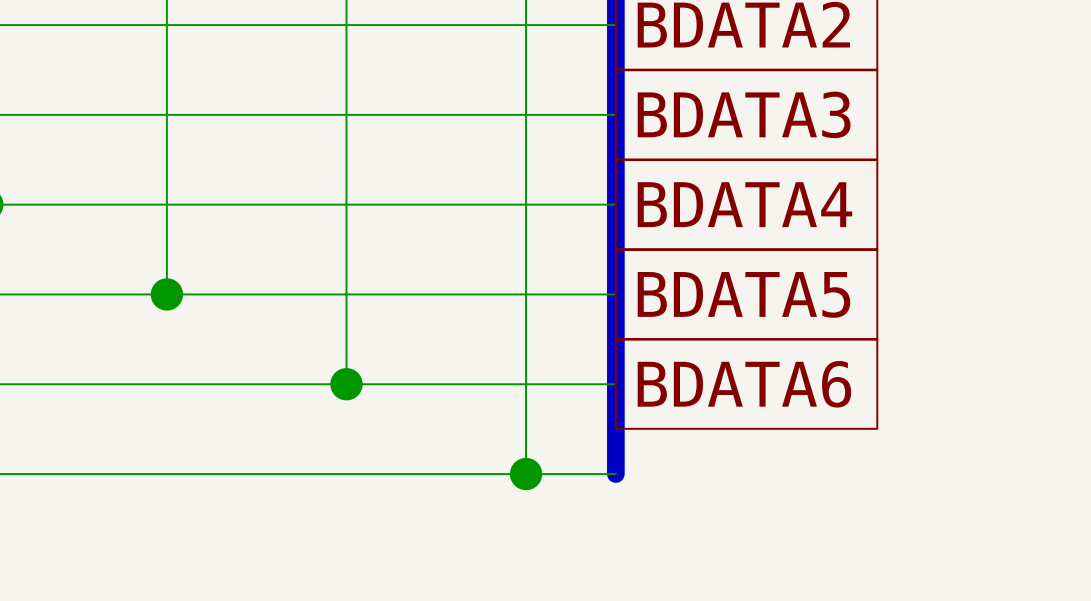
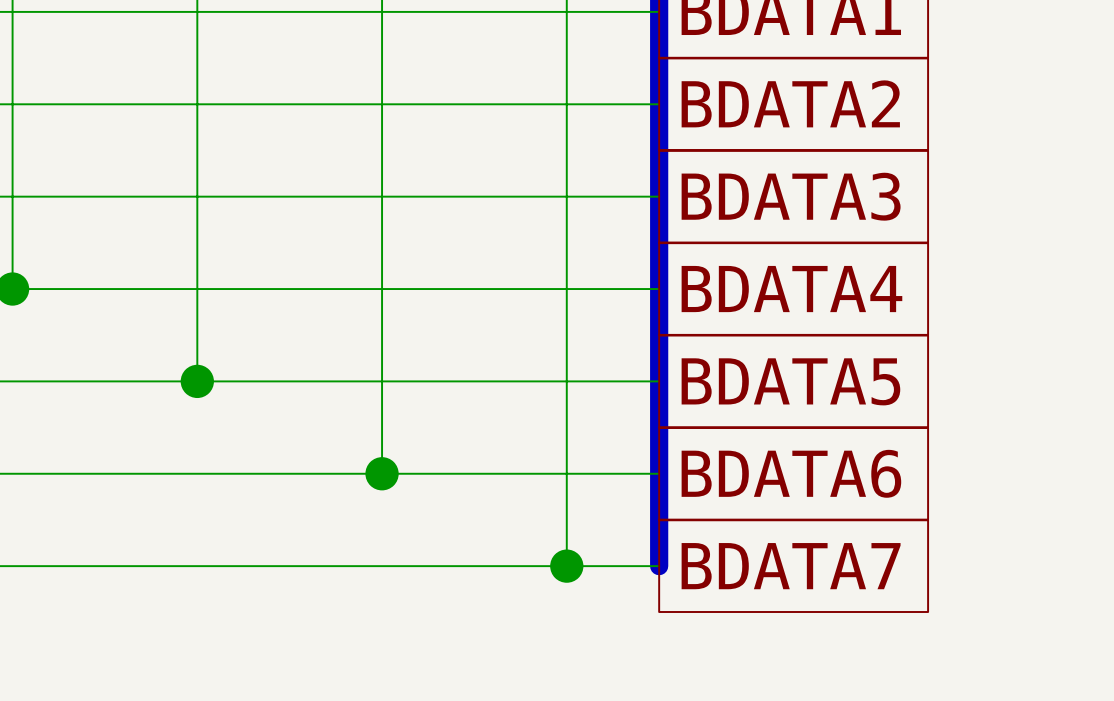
global label: none -> BDATA7 (791, 566)

